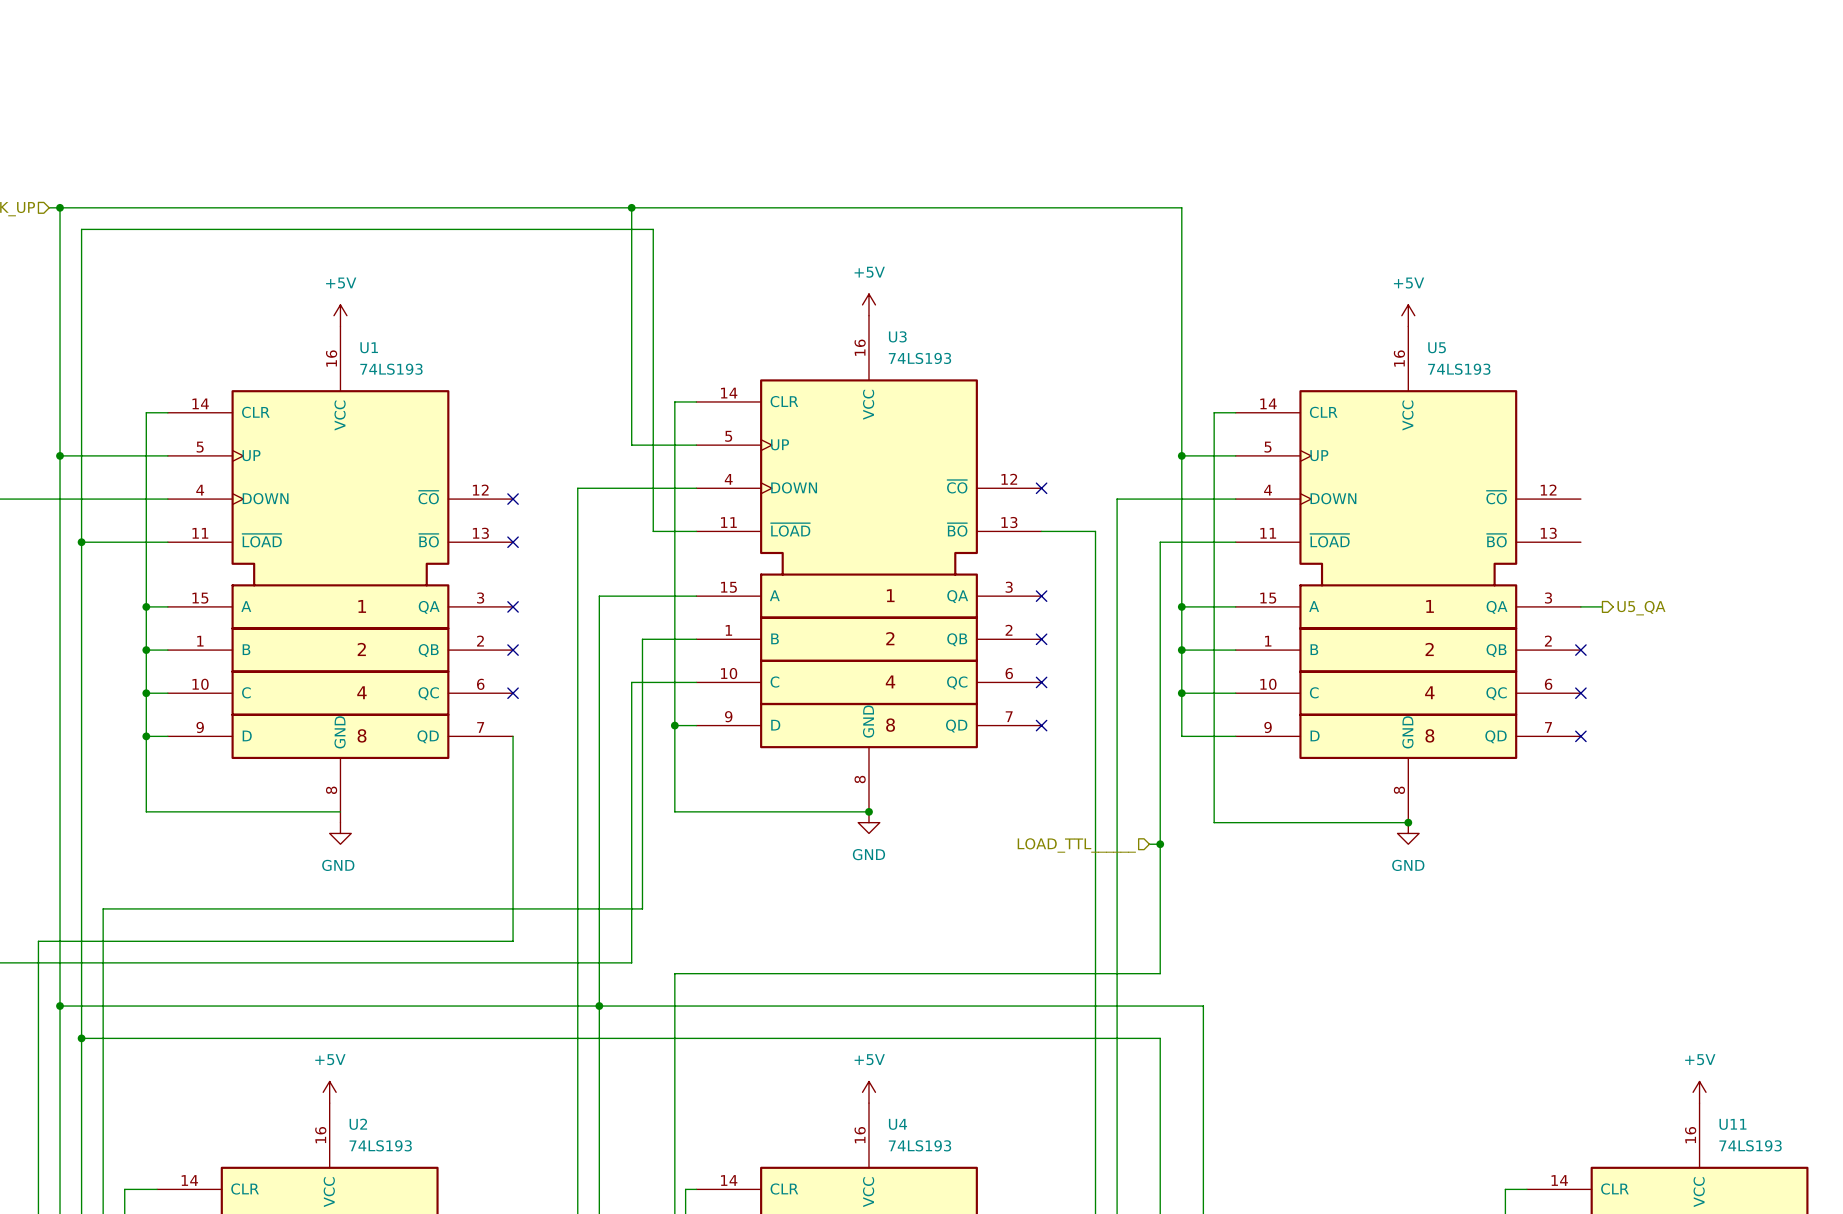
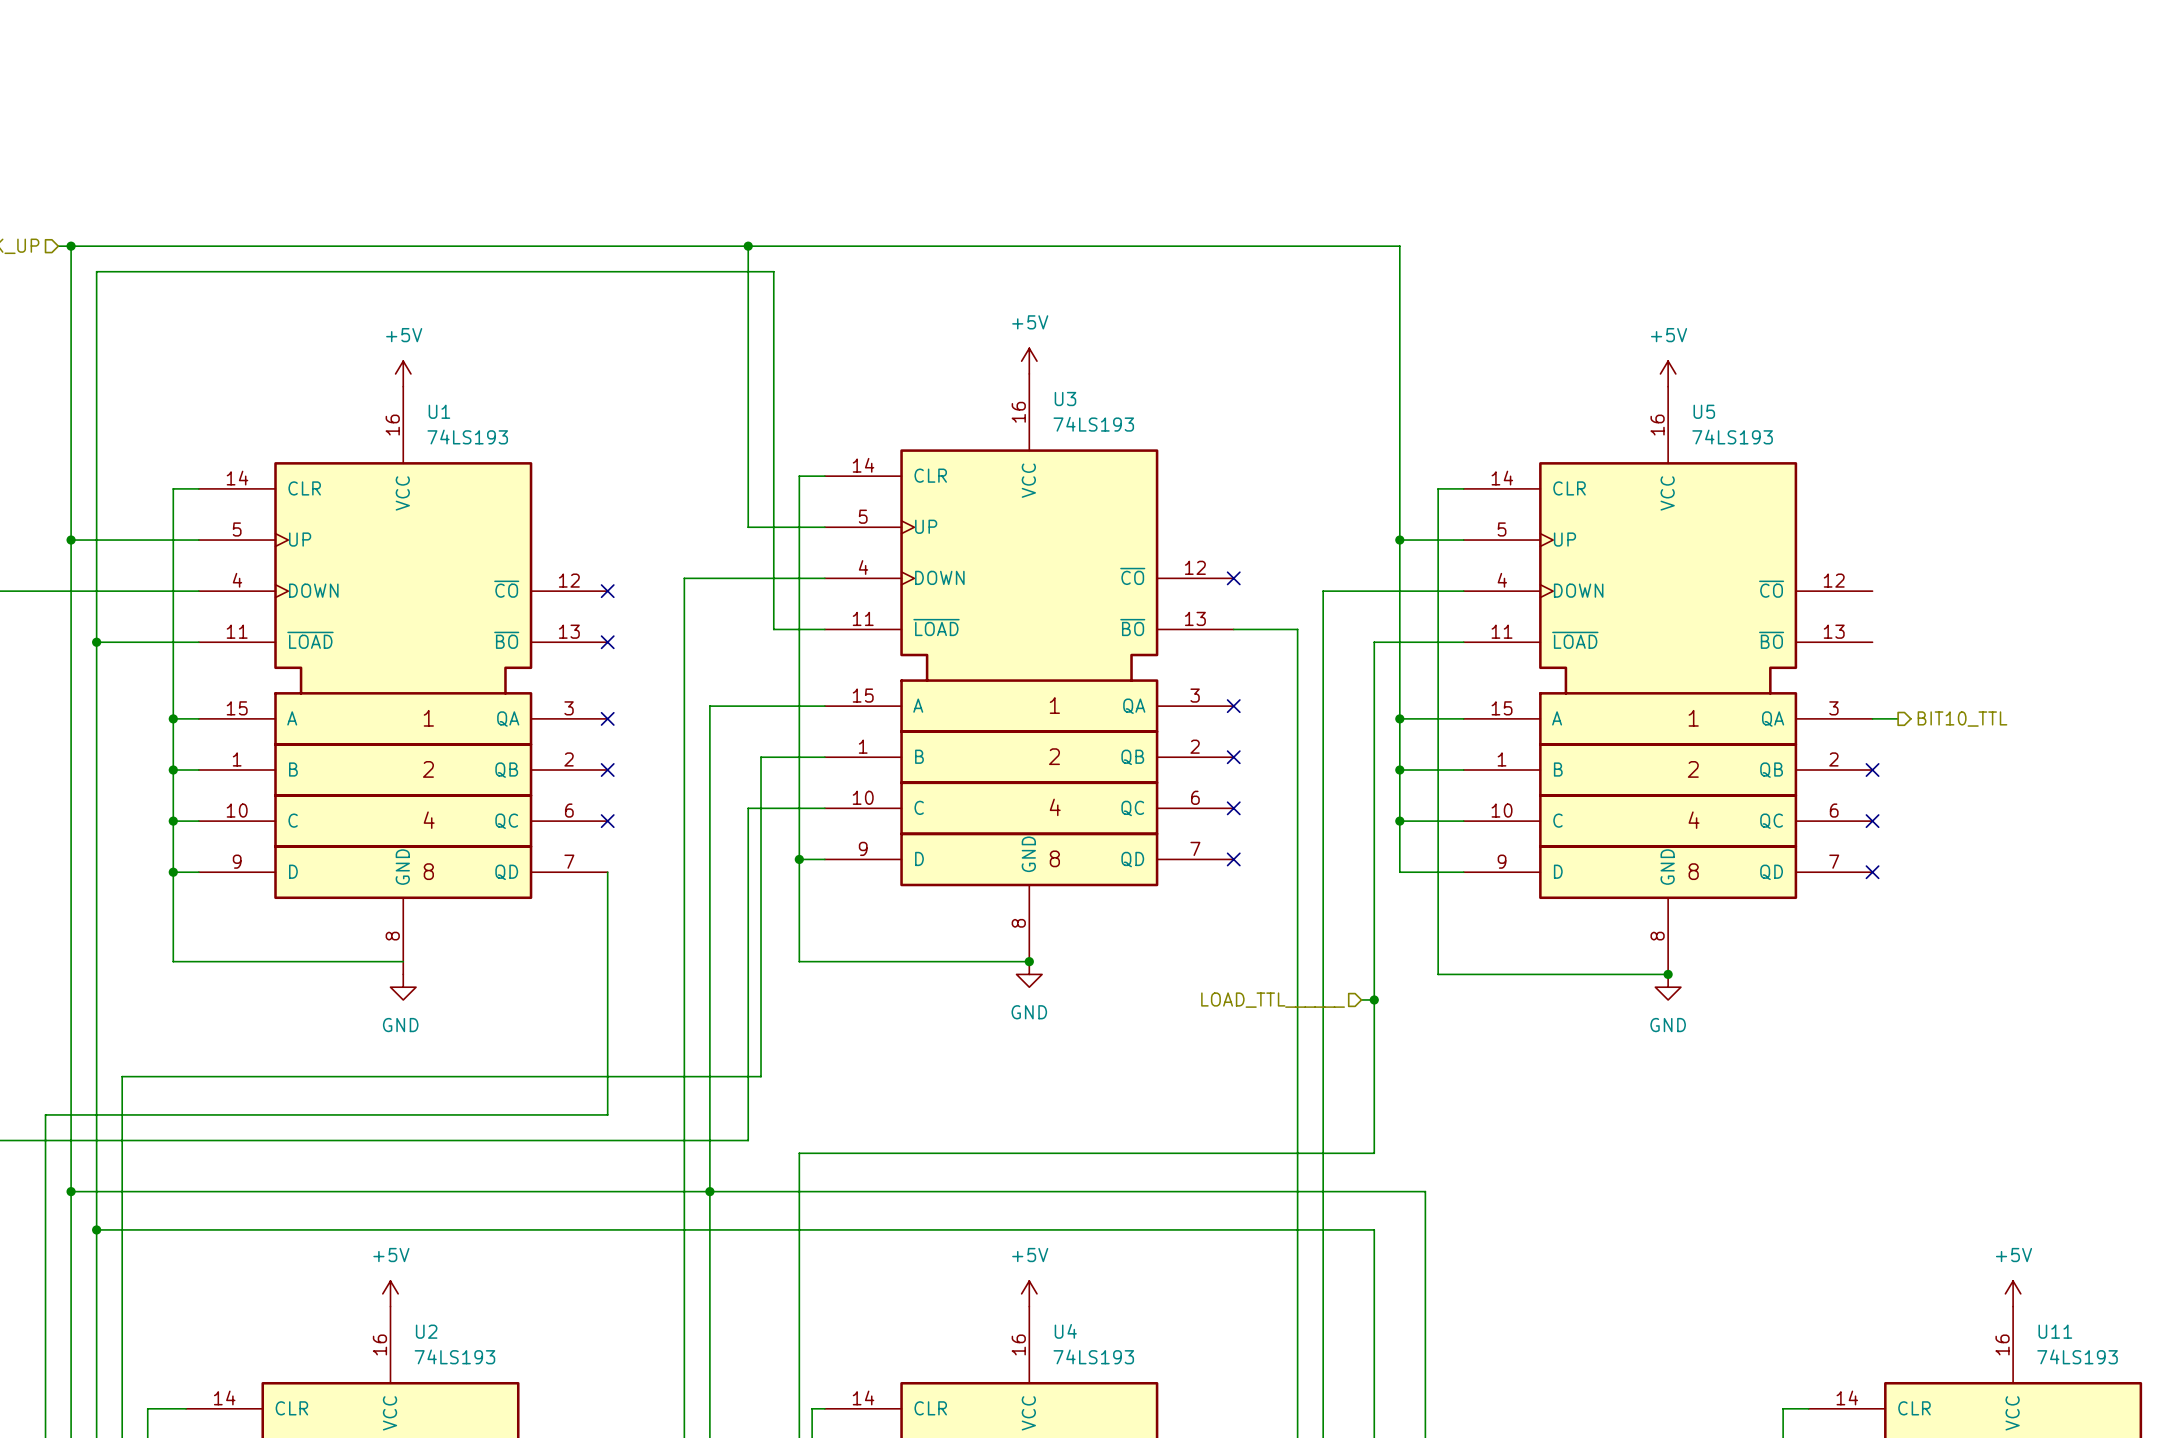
hierarchical label: U5_QA (1641, 608) -> BIT10_TTL (1962, 719)

